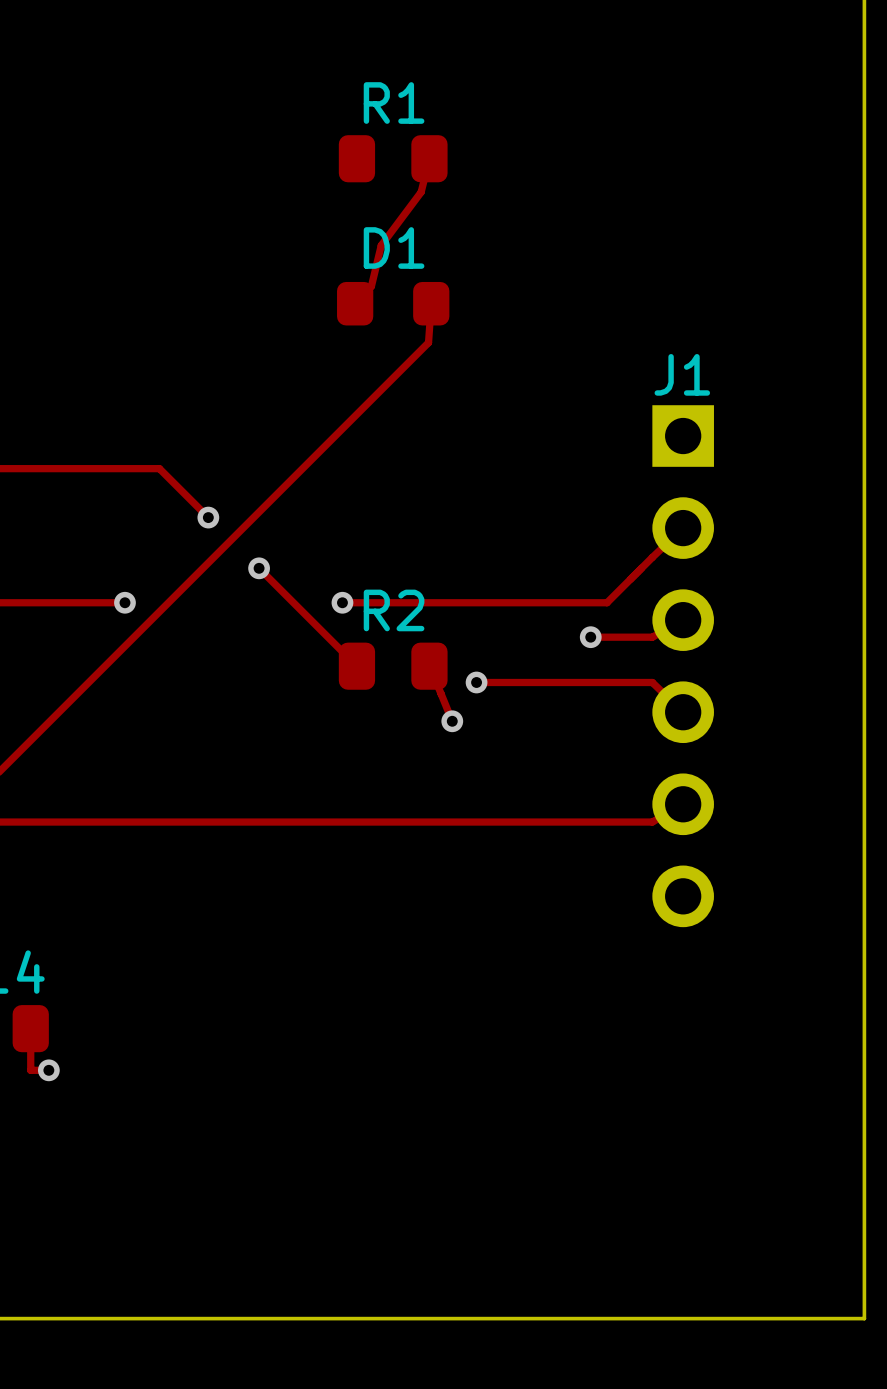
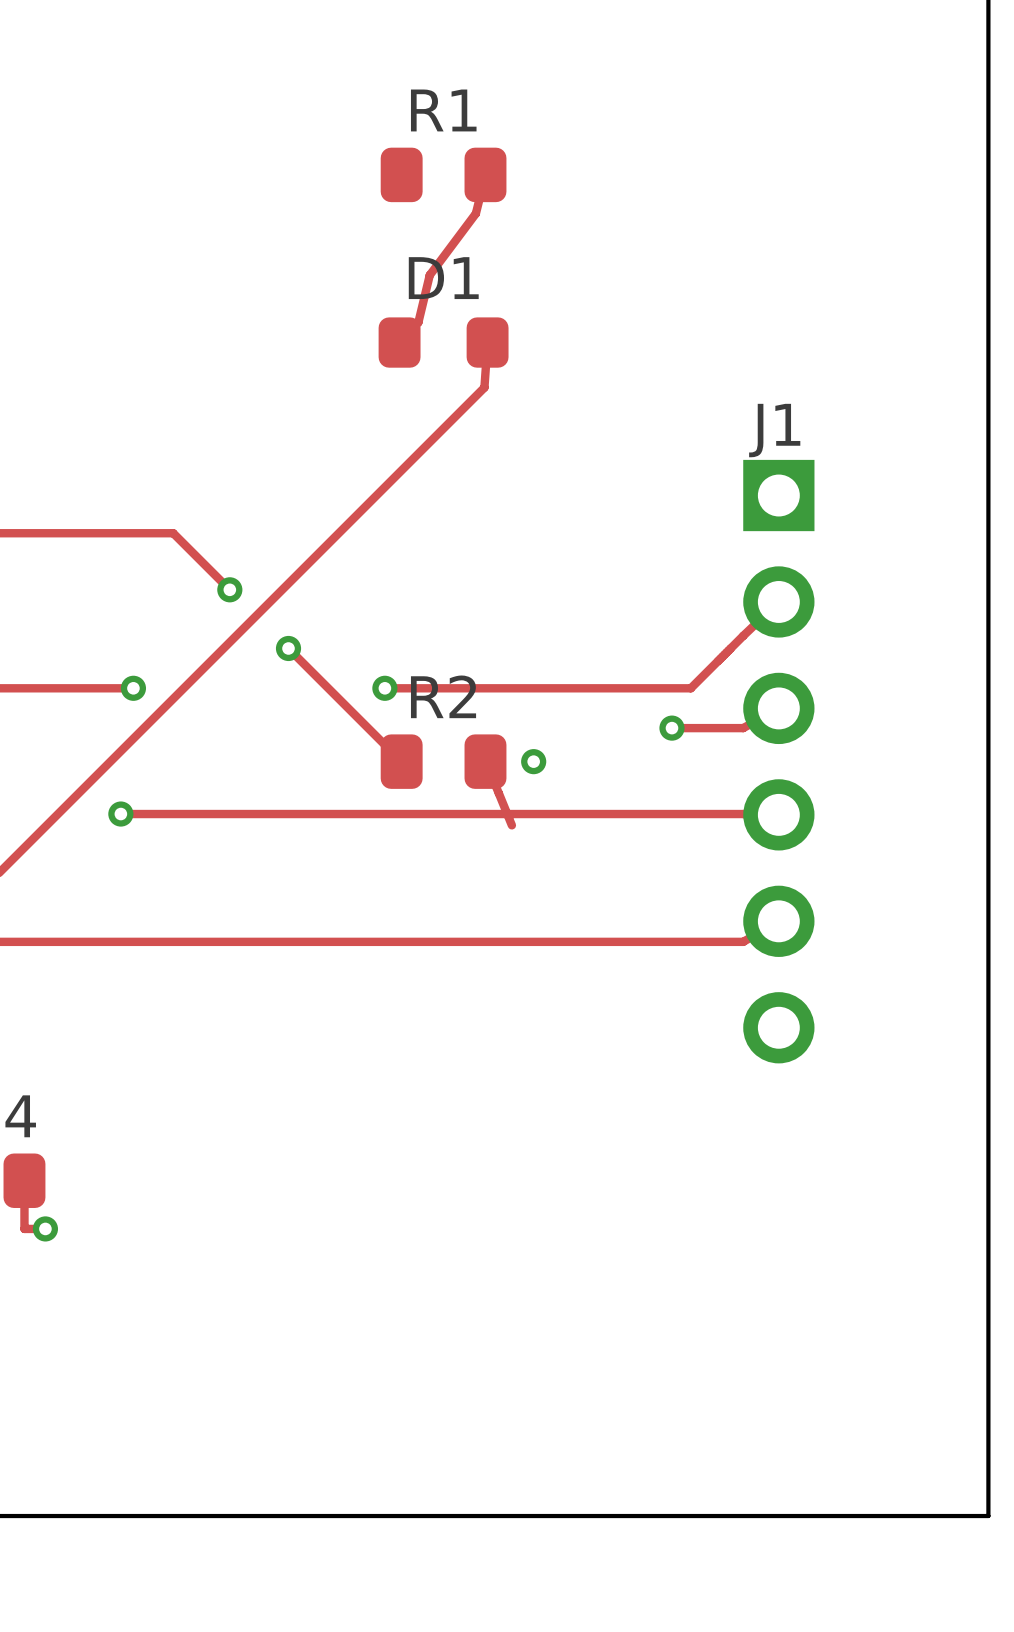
track: (476, 682) (652, 682) (683, 712) -> (120, 814) (778, 814)
via position: (476, 682) -> (533, 761)
via: none -> (120, 814)
via: (452, 721) -> none

